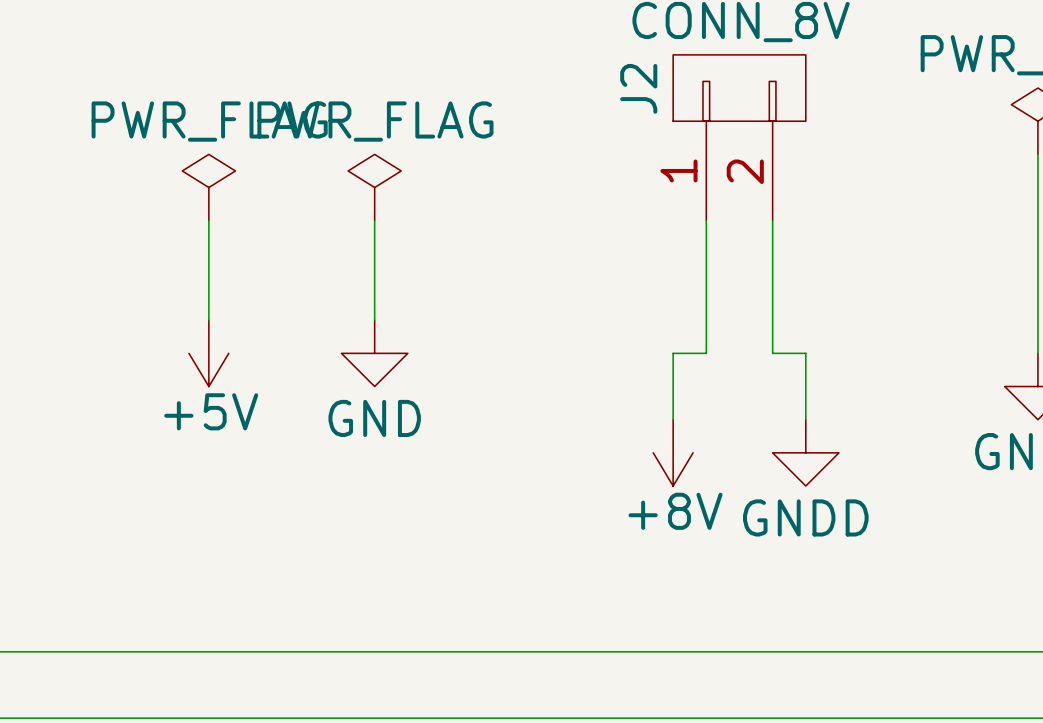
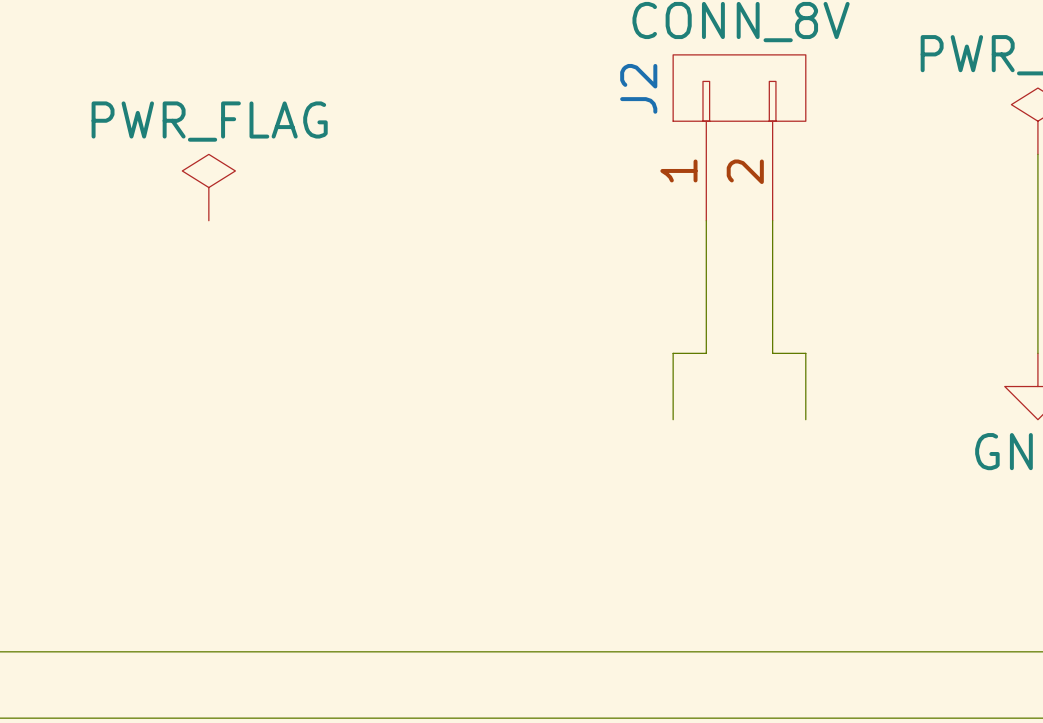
power symbol: PWR_FLAG (374, 187) -> none
wire: (208, 220) (208, 320) -> none
wire: (374, 220) (374, 320) -> none
power symbol: +5V (208, 353) -> none
power symbol: GND (374, 353) -> none
power symbol: +8V (673, 452) -> none
power symbol: GNDD (805, 452) -> none

